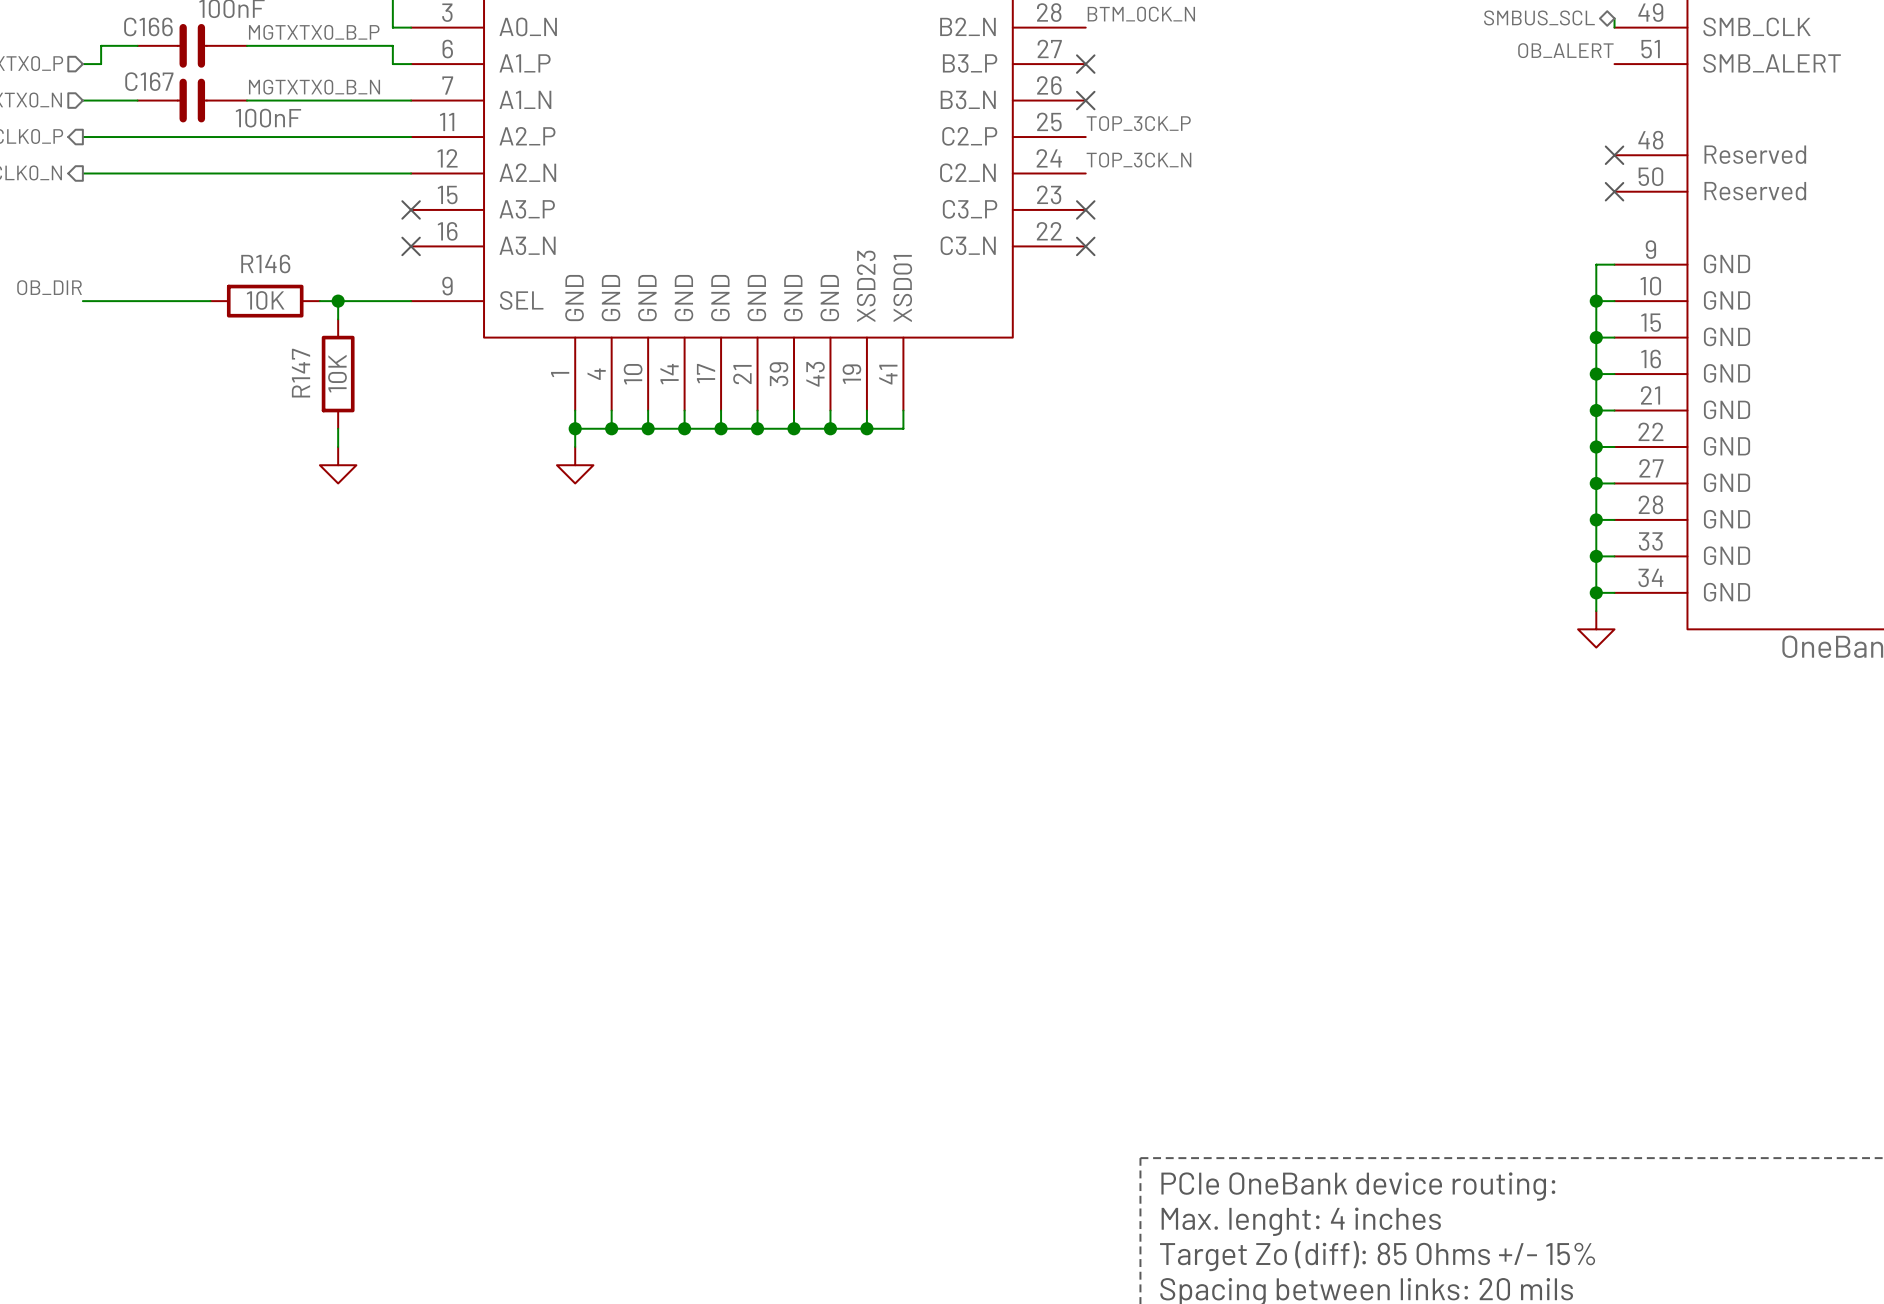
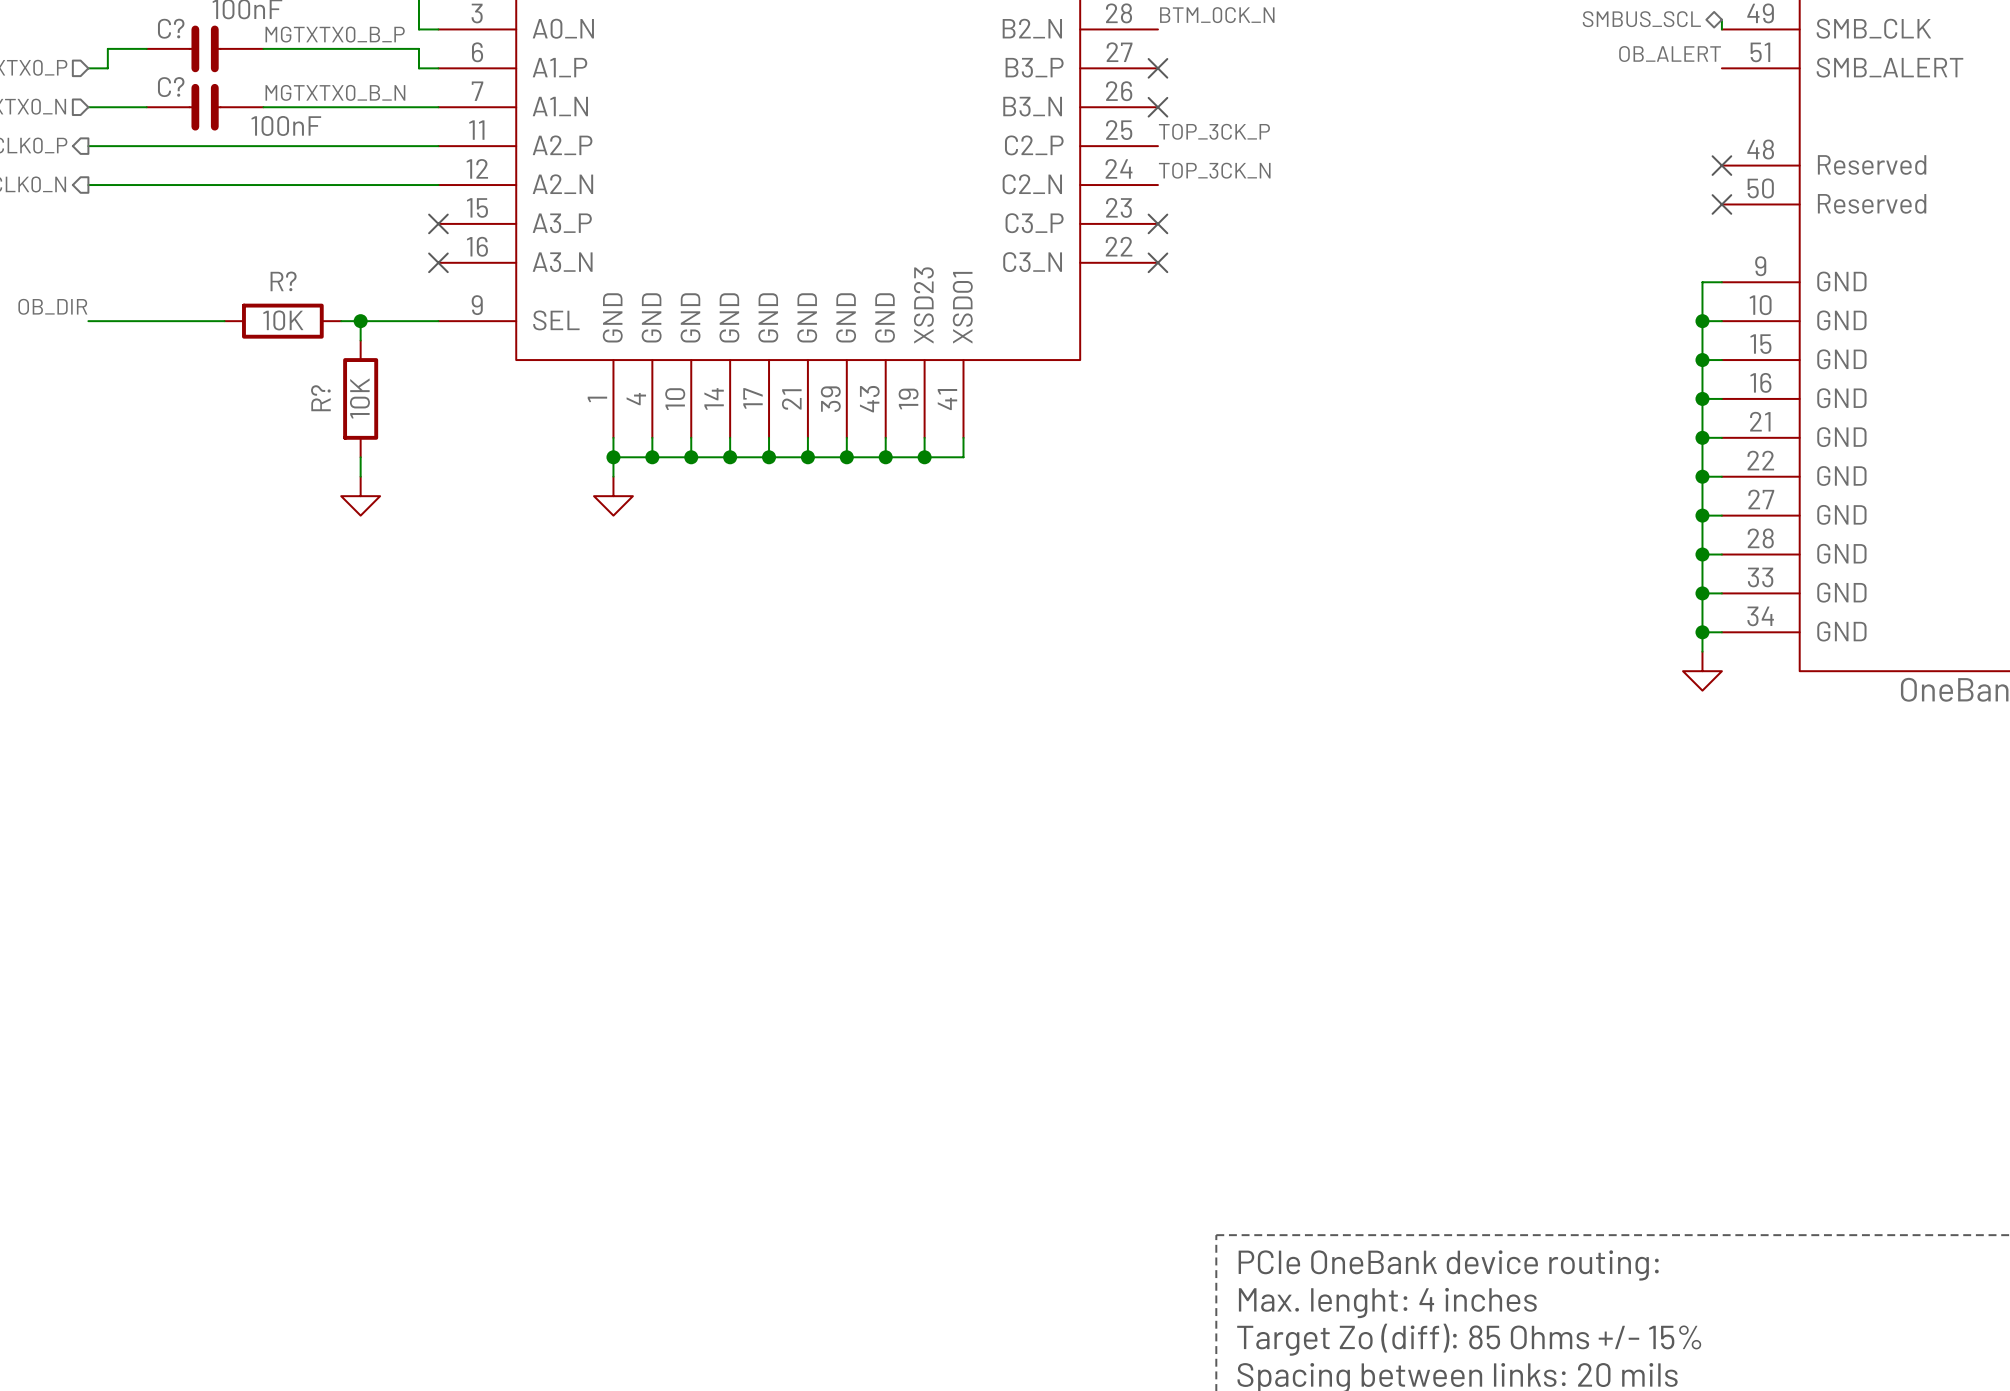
C166 name: C166 (148, 26) -> C? (171, 28)
C167 name: C167 (149, 81) -> C? (171, 87)
R146 name: R146 (265, 263) -> R? (283, 281)
R147 name: R147 (301, 373) -> R? (320, 398)

